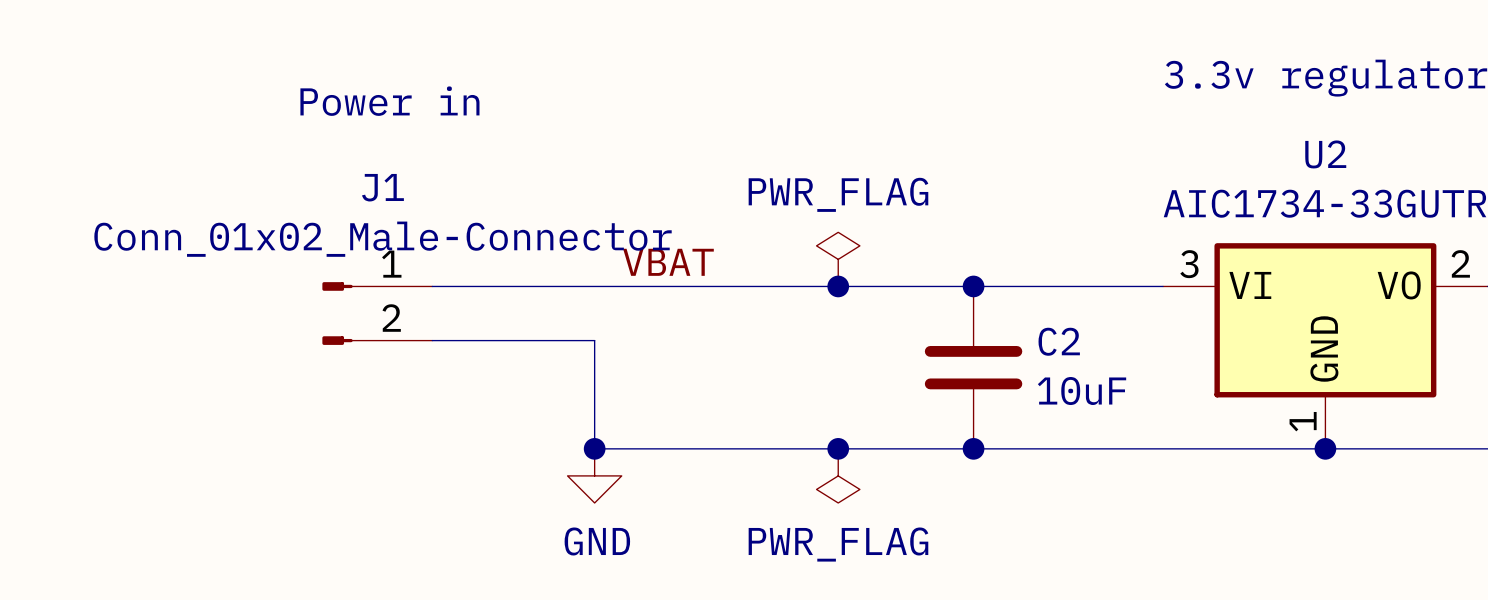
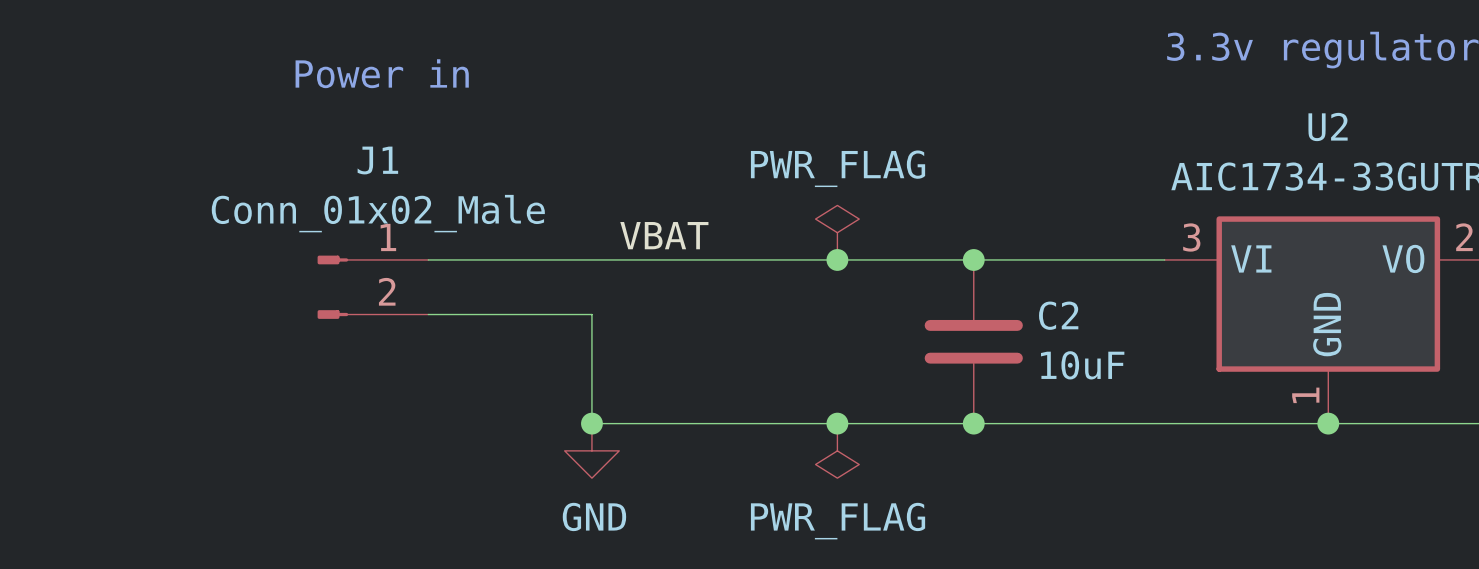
J1 value: Conn_01x02_Male-Connector (383, 239) -> Conn_01x02_Male (378, 213)

